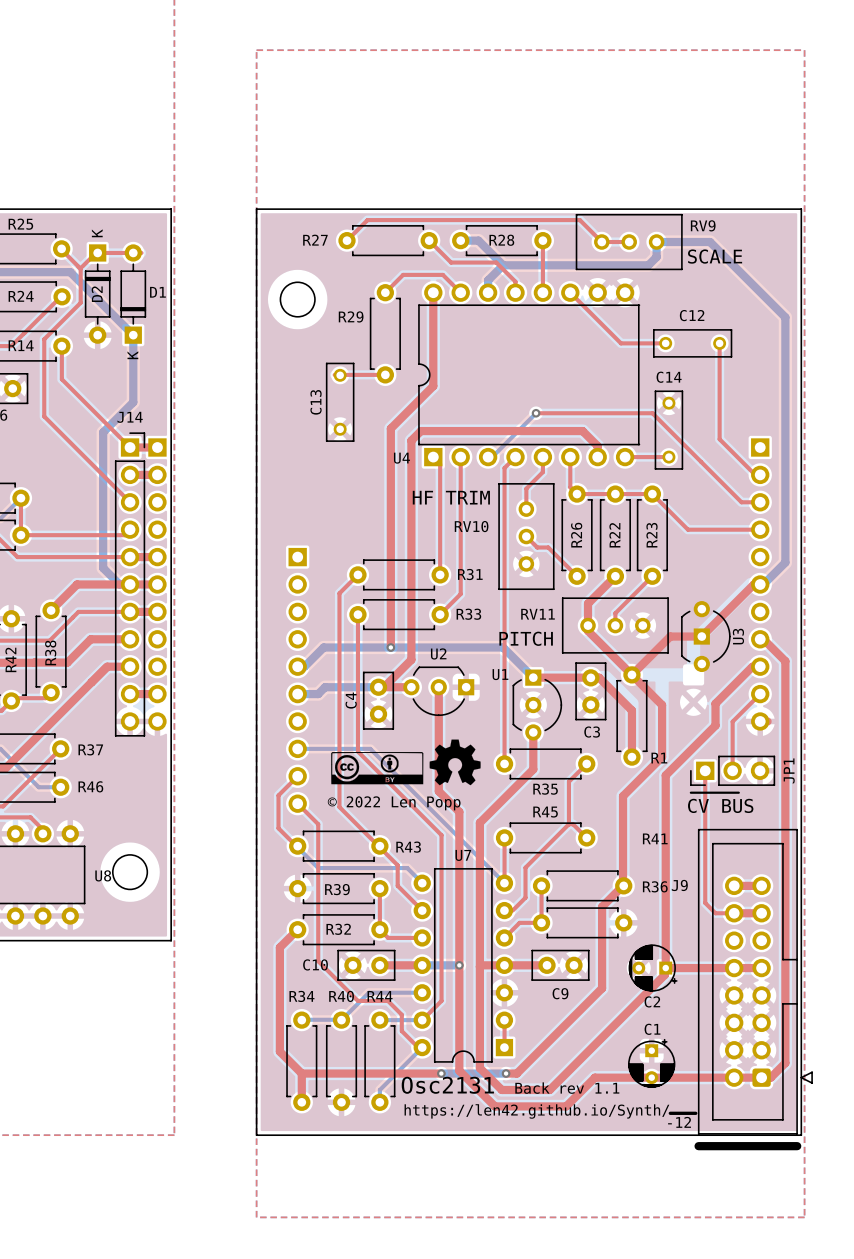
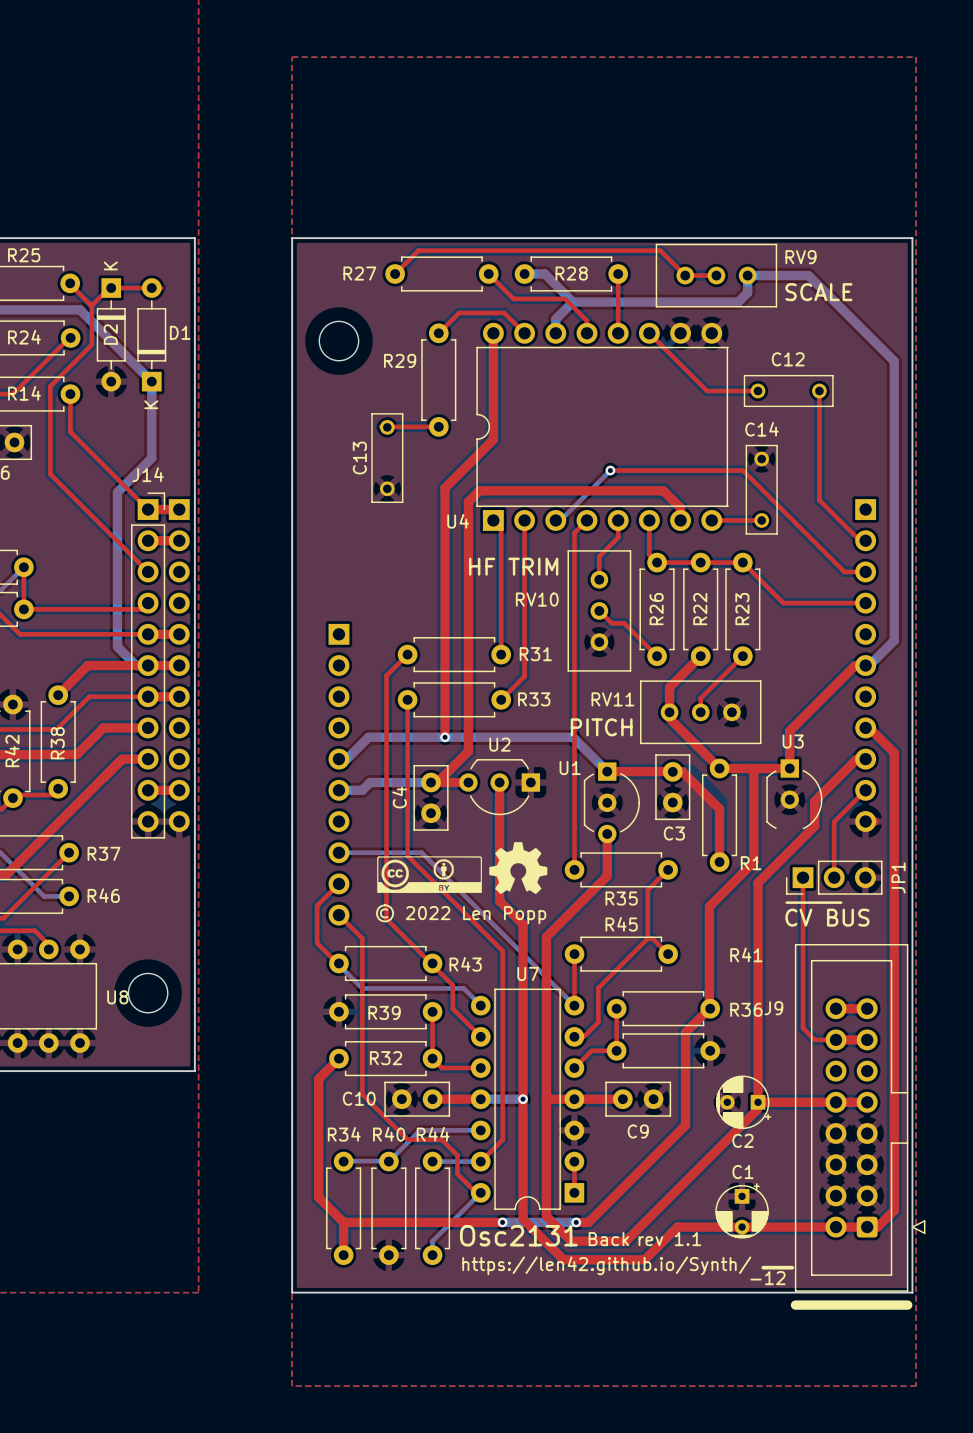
top track: (753, 584) (701, 636) (670, 636) (631, 674) (662, 705) -> (858, 665) (855, 665) (789, 731) (789, 768) (719, 768)
U3 footprint: [681, 601, 731, 673] -> [766, 759, 823, 830]
U3 name position: U3 (738, 636) -> U3 (793, 741)
top track: none -> (750, 768) (753, 771) (753, 802)

